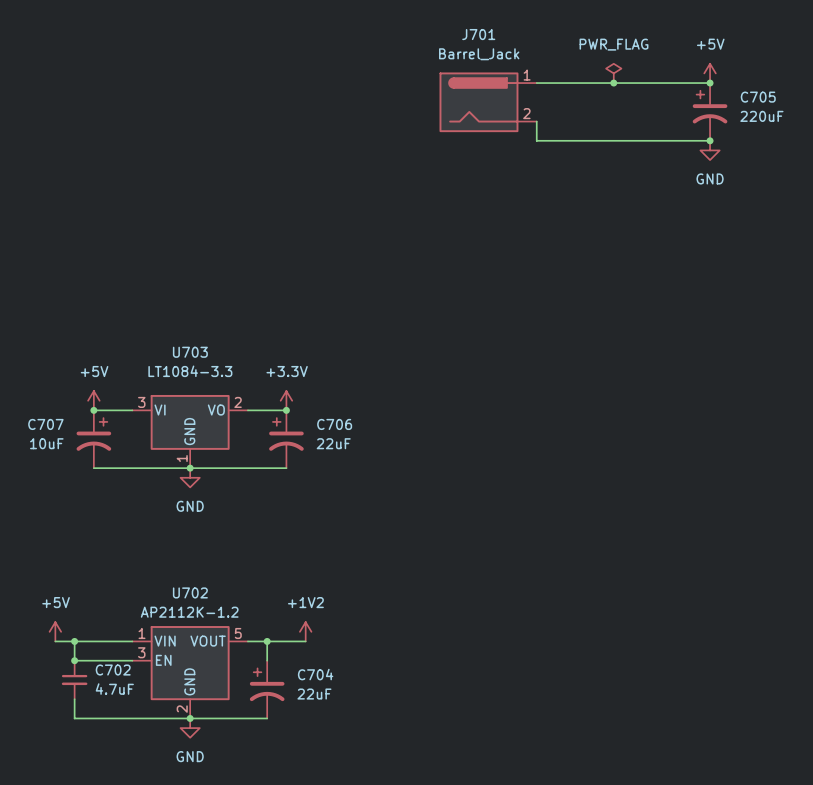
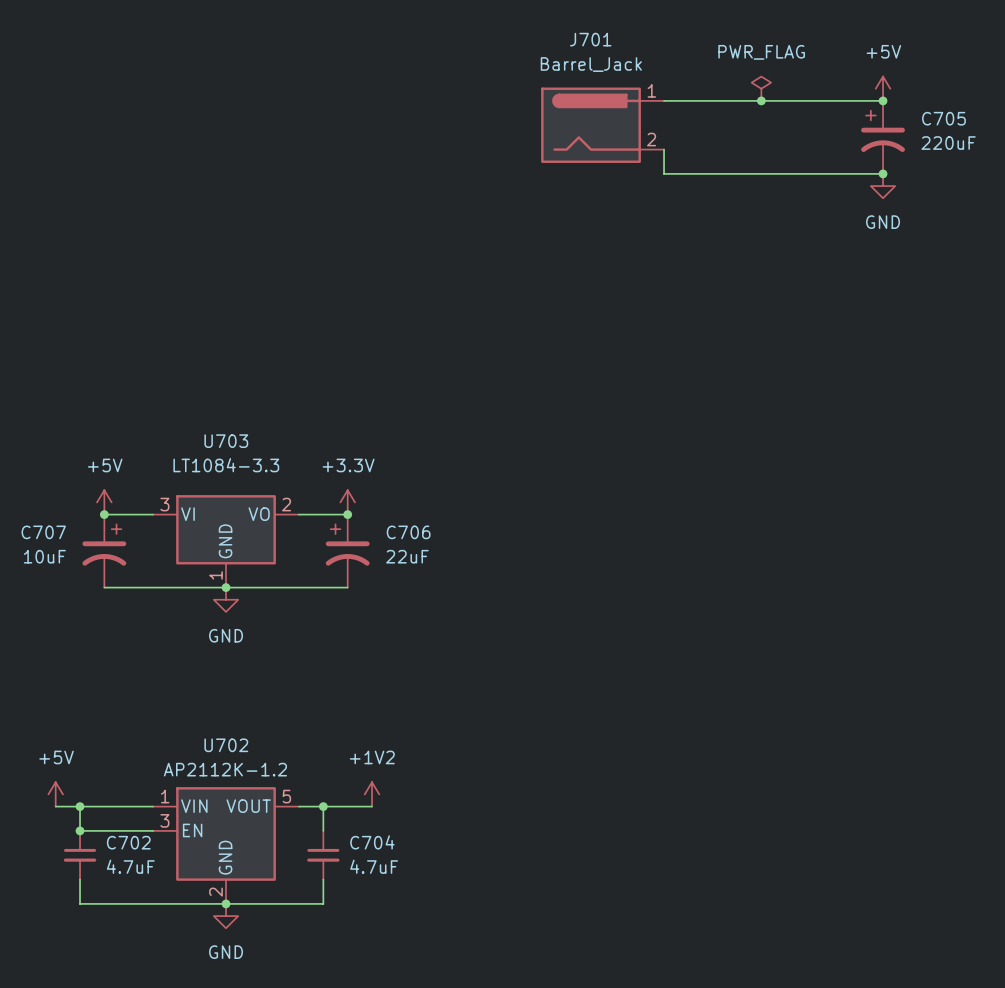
C704 symbol: [249, 660, 285, 719] -> [307, 830, 340, 880]
C704 value: 22uF (314, 694) -> 4.7uF (374, 866)

